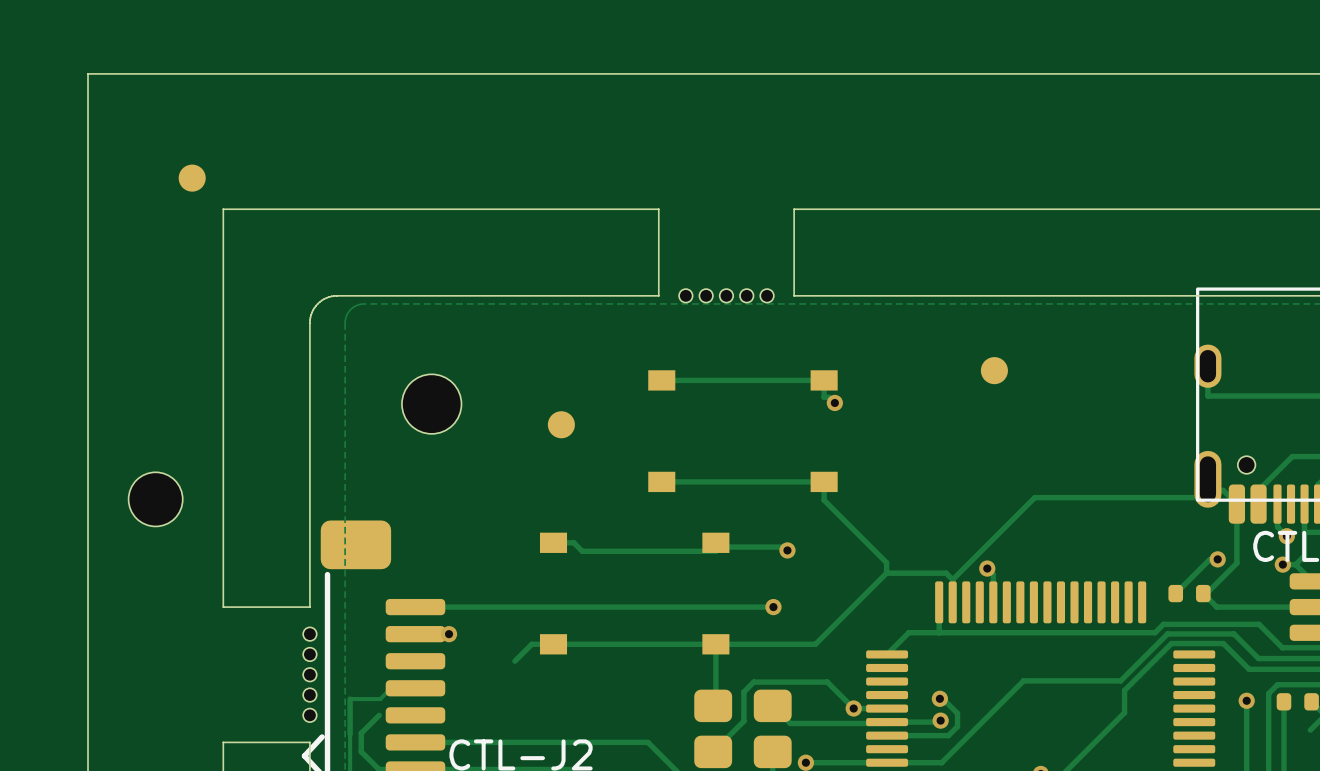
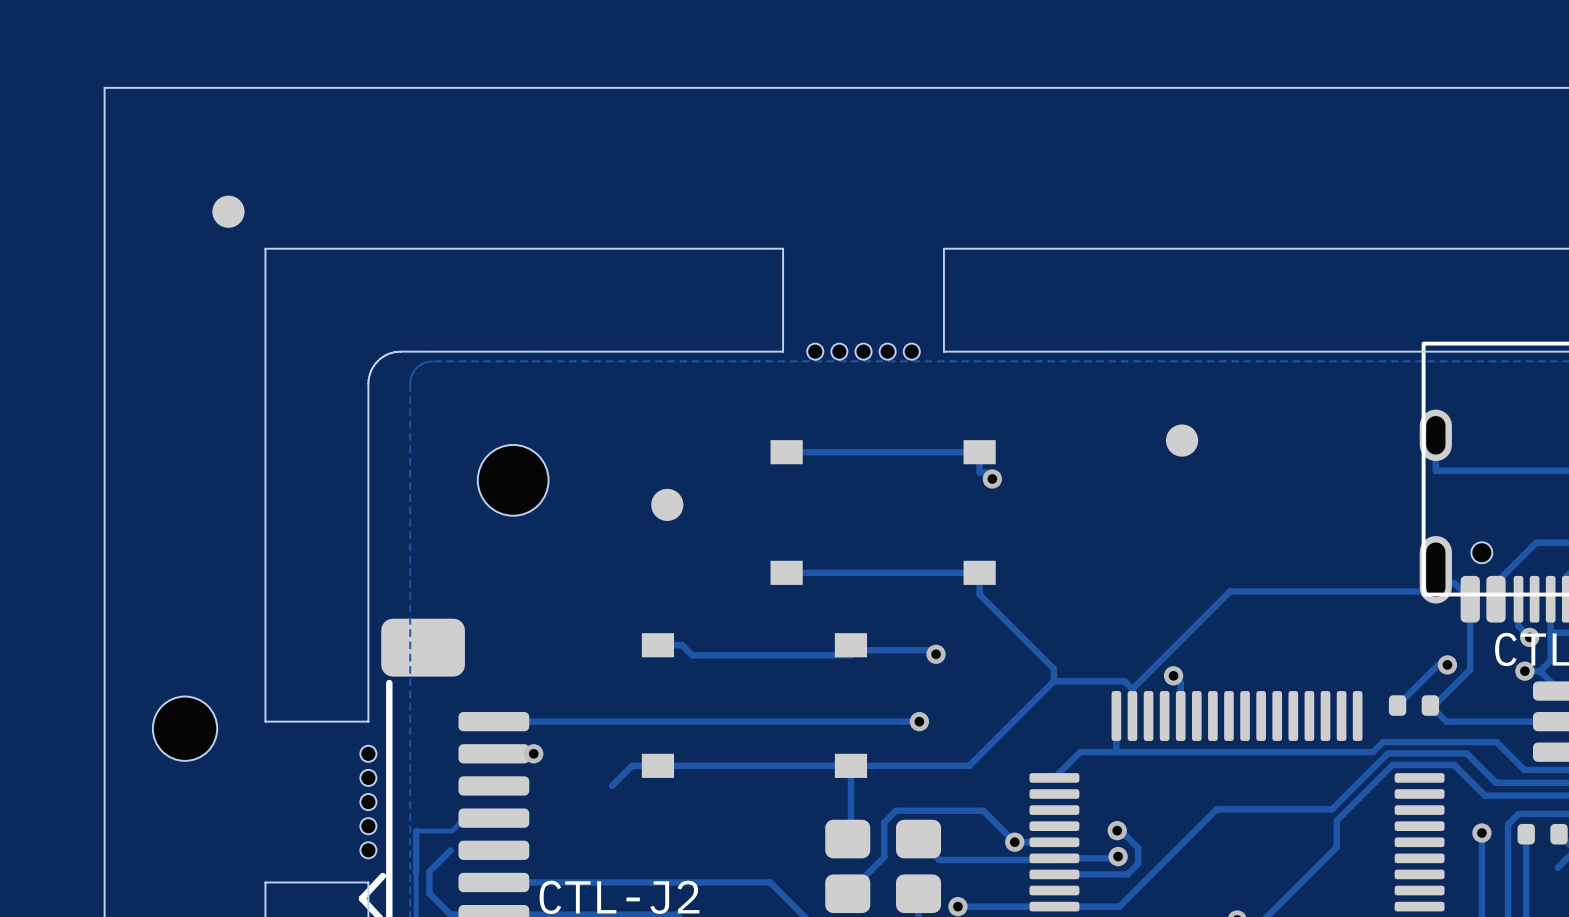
part position: (155, 499) -> (185, 728)

